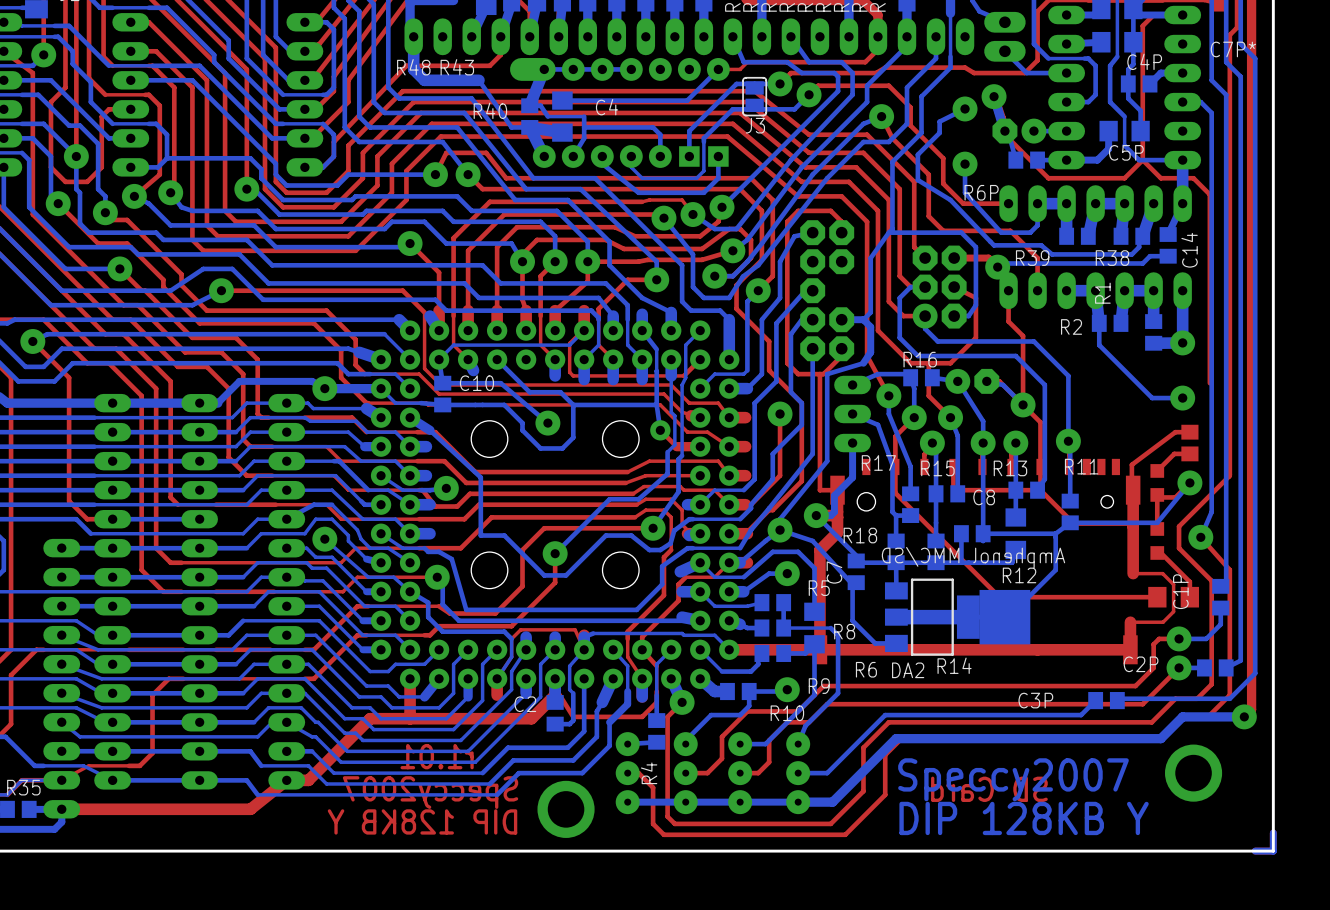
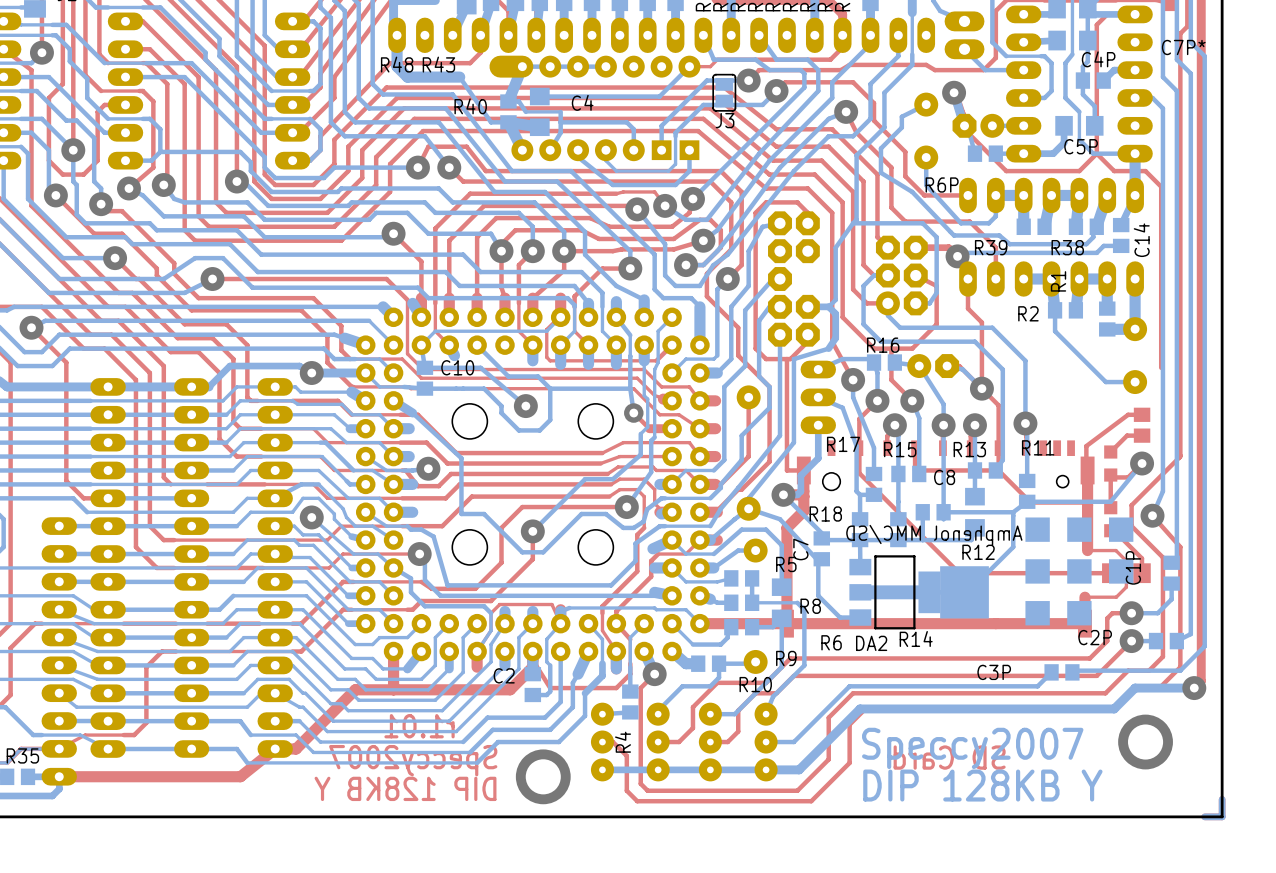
drawing: none -> [1025, 517, 1050, 542]
drawing: none -> [1067, 517, 1092, 542]
drawing: none -> [1108, 517, 1134, 542]
drawing: none -> [1025, 559, 1050, 584]
drawing: none -> [1067, 559, 1092, 584]
drawing: none -> [1108, 559, 1134, 584]
drawing: none -> [1025, 601, 1050, 626]
drawing: none -> [1067, 601, 1092, 626]

